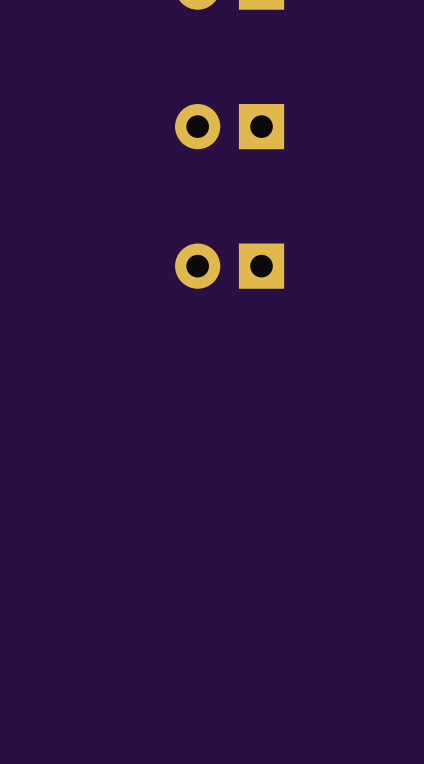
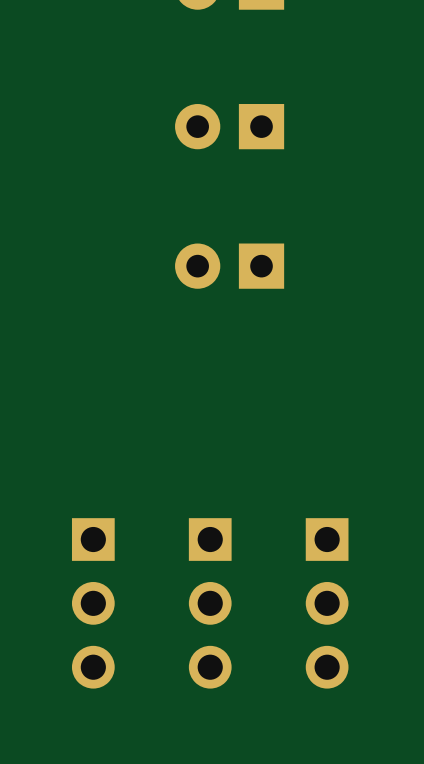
part: none -> (93, 603)
part: none -> (210, 603)
part: none -> (327, 603)

